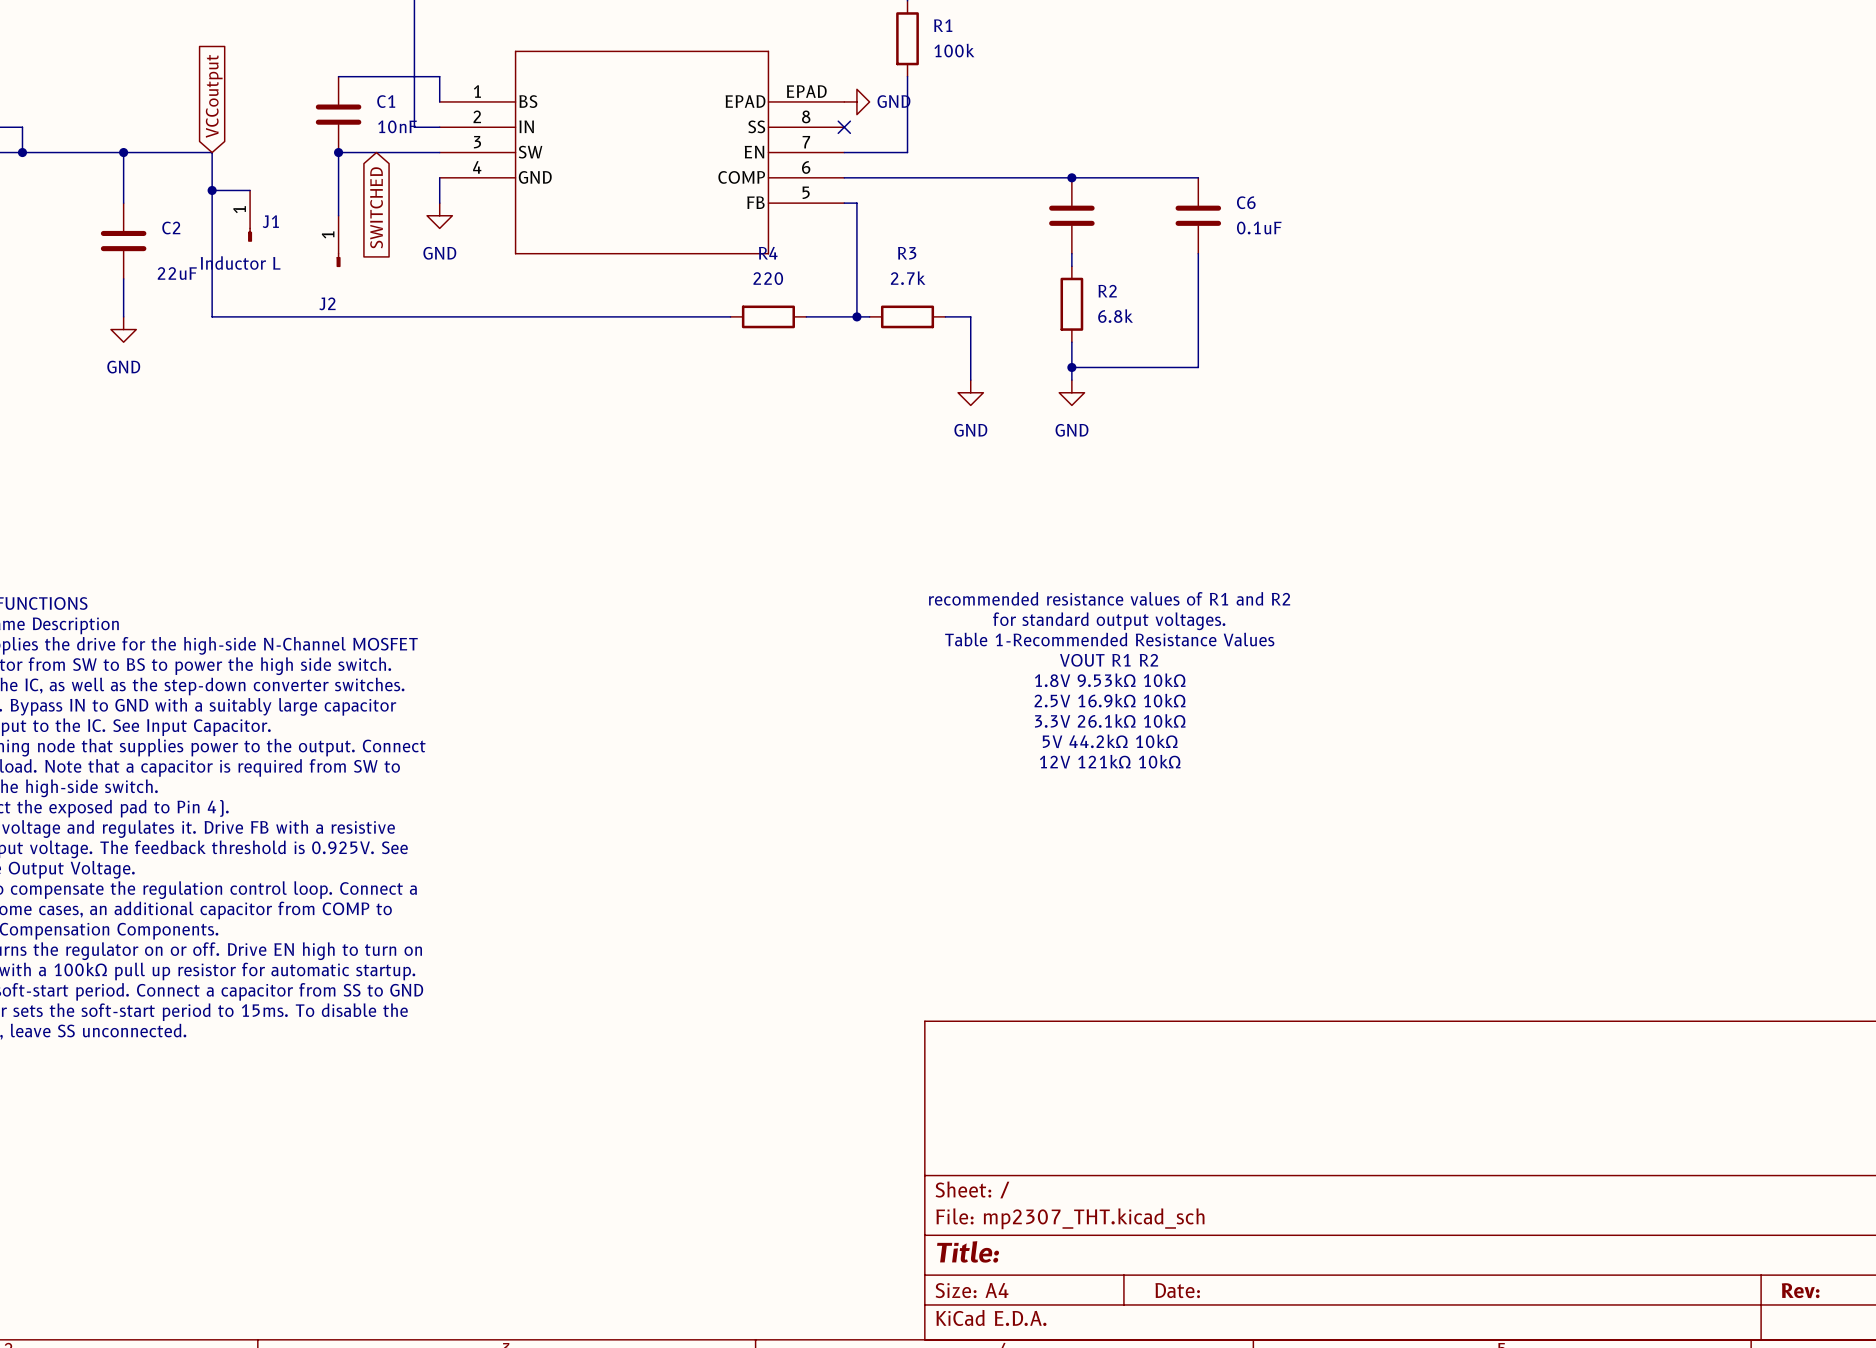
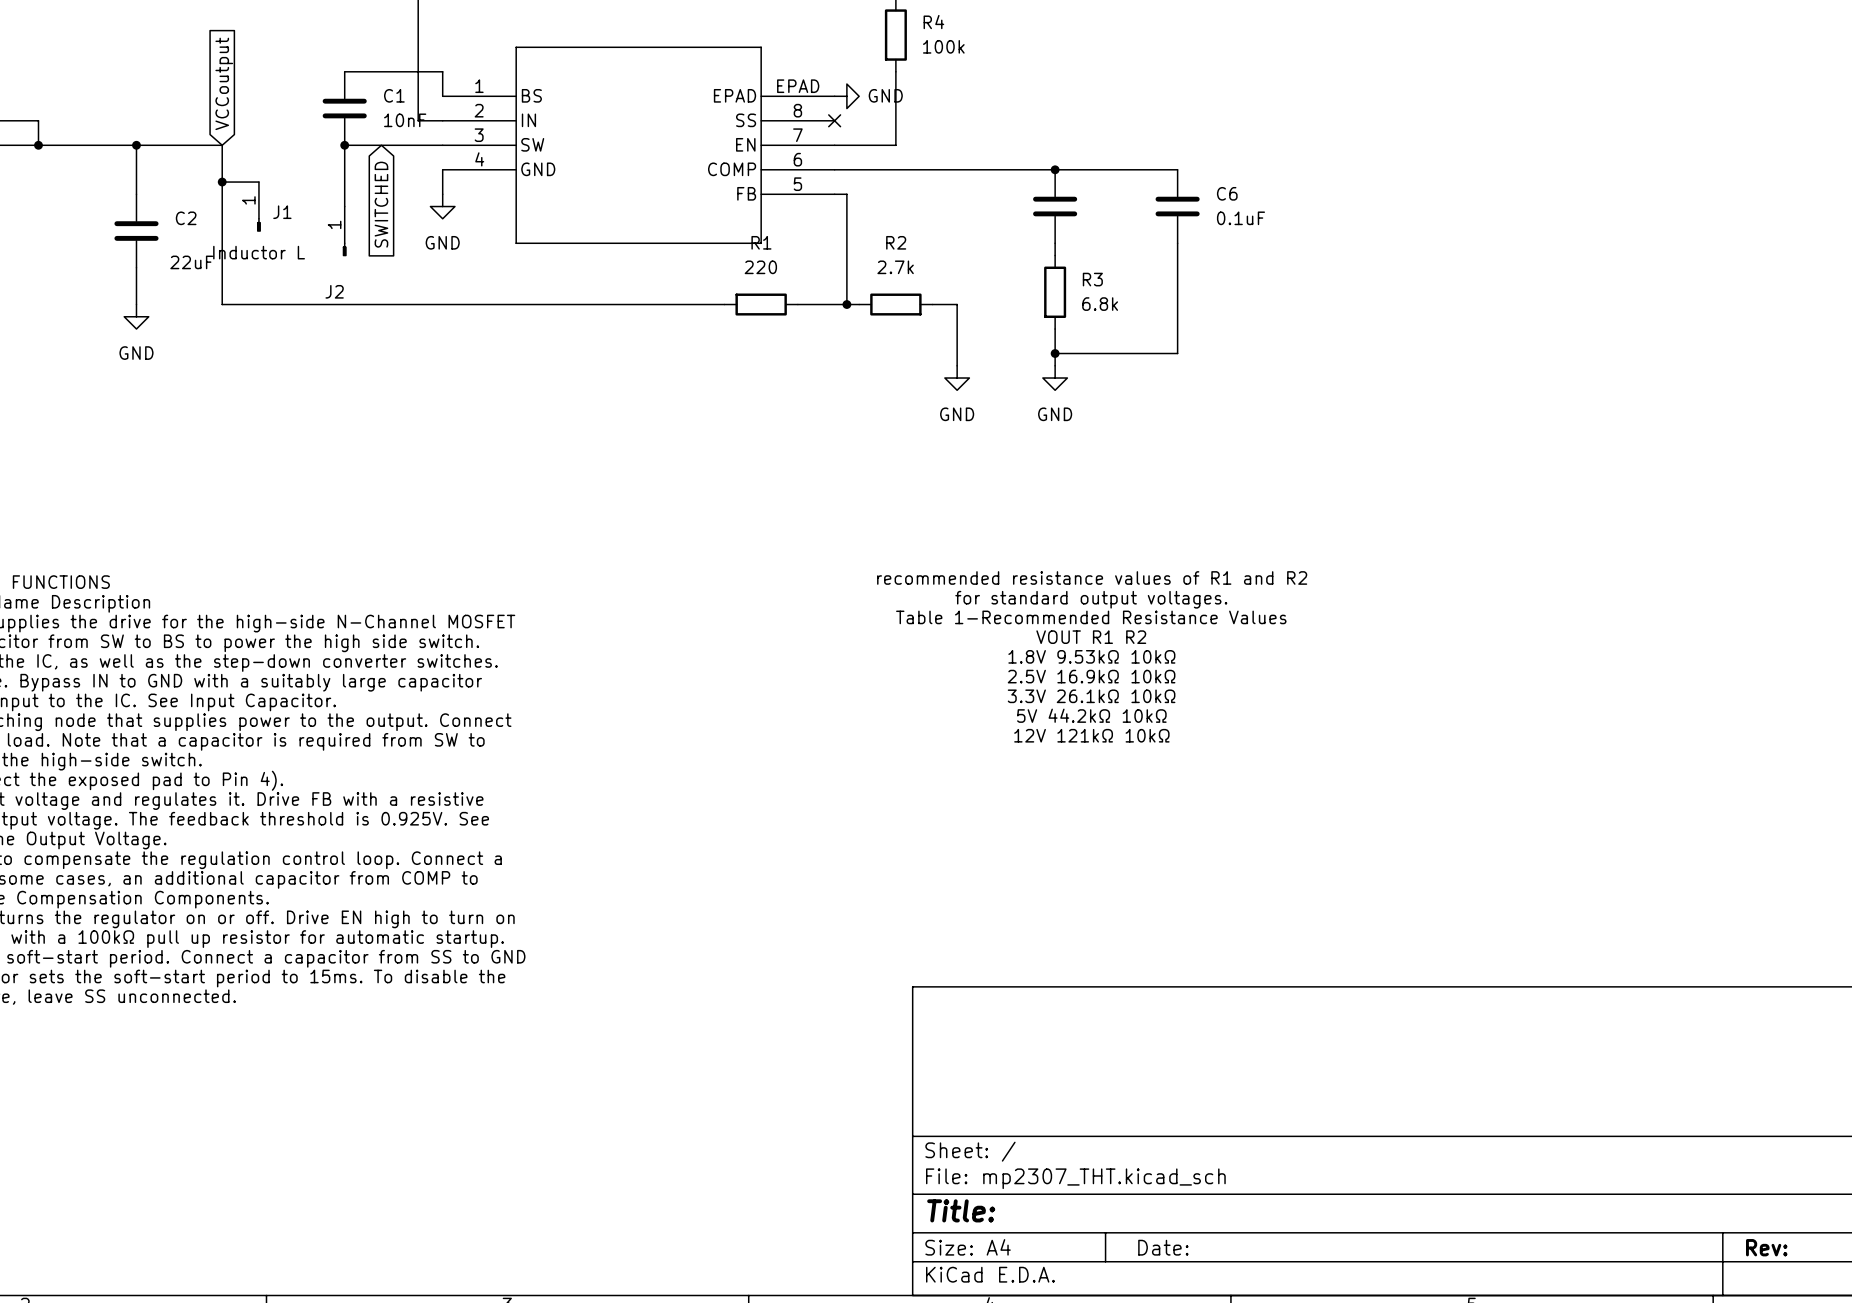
R1 name: R1 (943, 25) -> R4 (933, 22)
R4 name: R4 (768, 253) -> R1 (761, 242)
R3 name: R3 (907, 253) -> R2 (896, 242)
R2 name: R2 (1107, 291) -> R3 (1092, 279)

